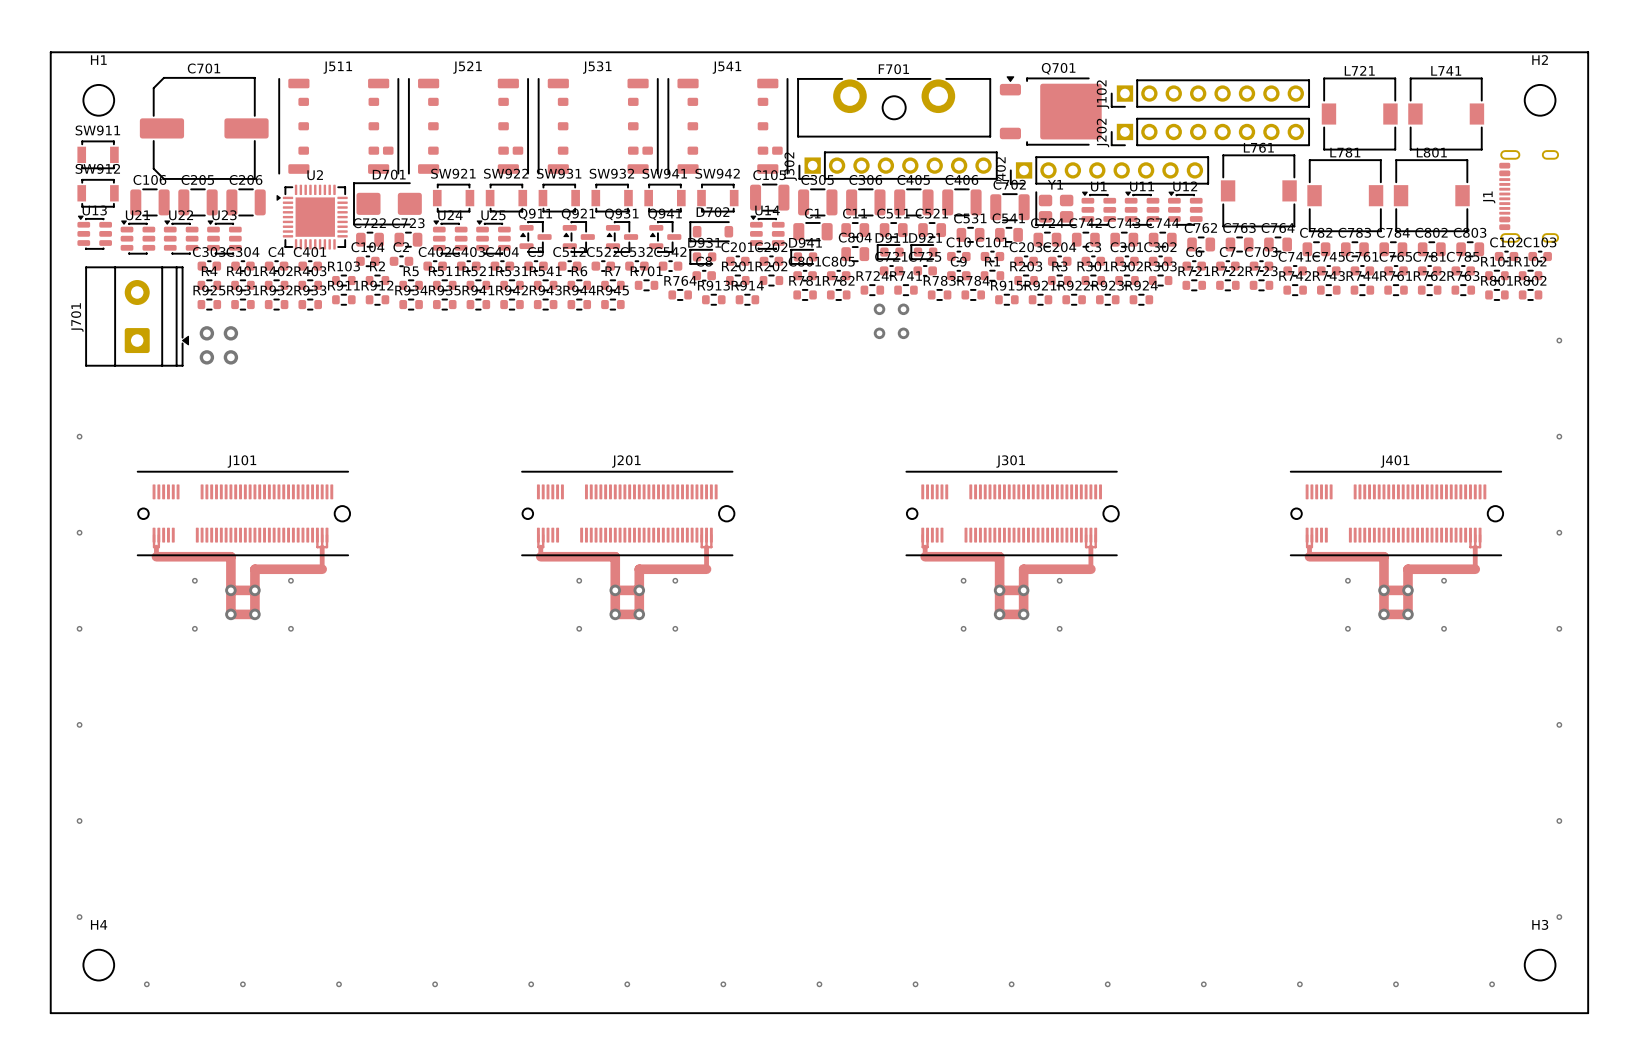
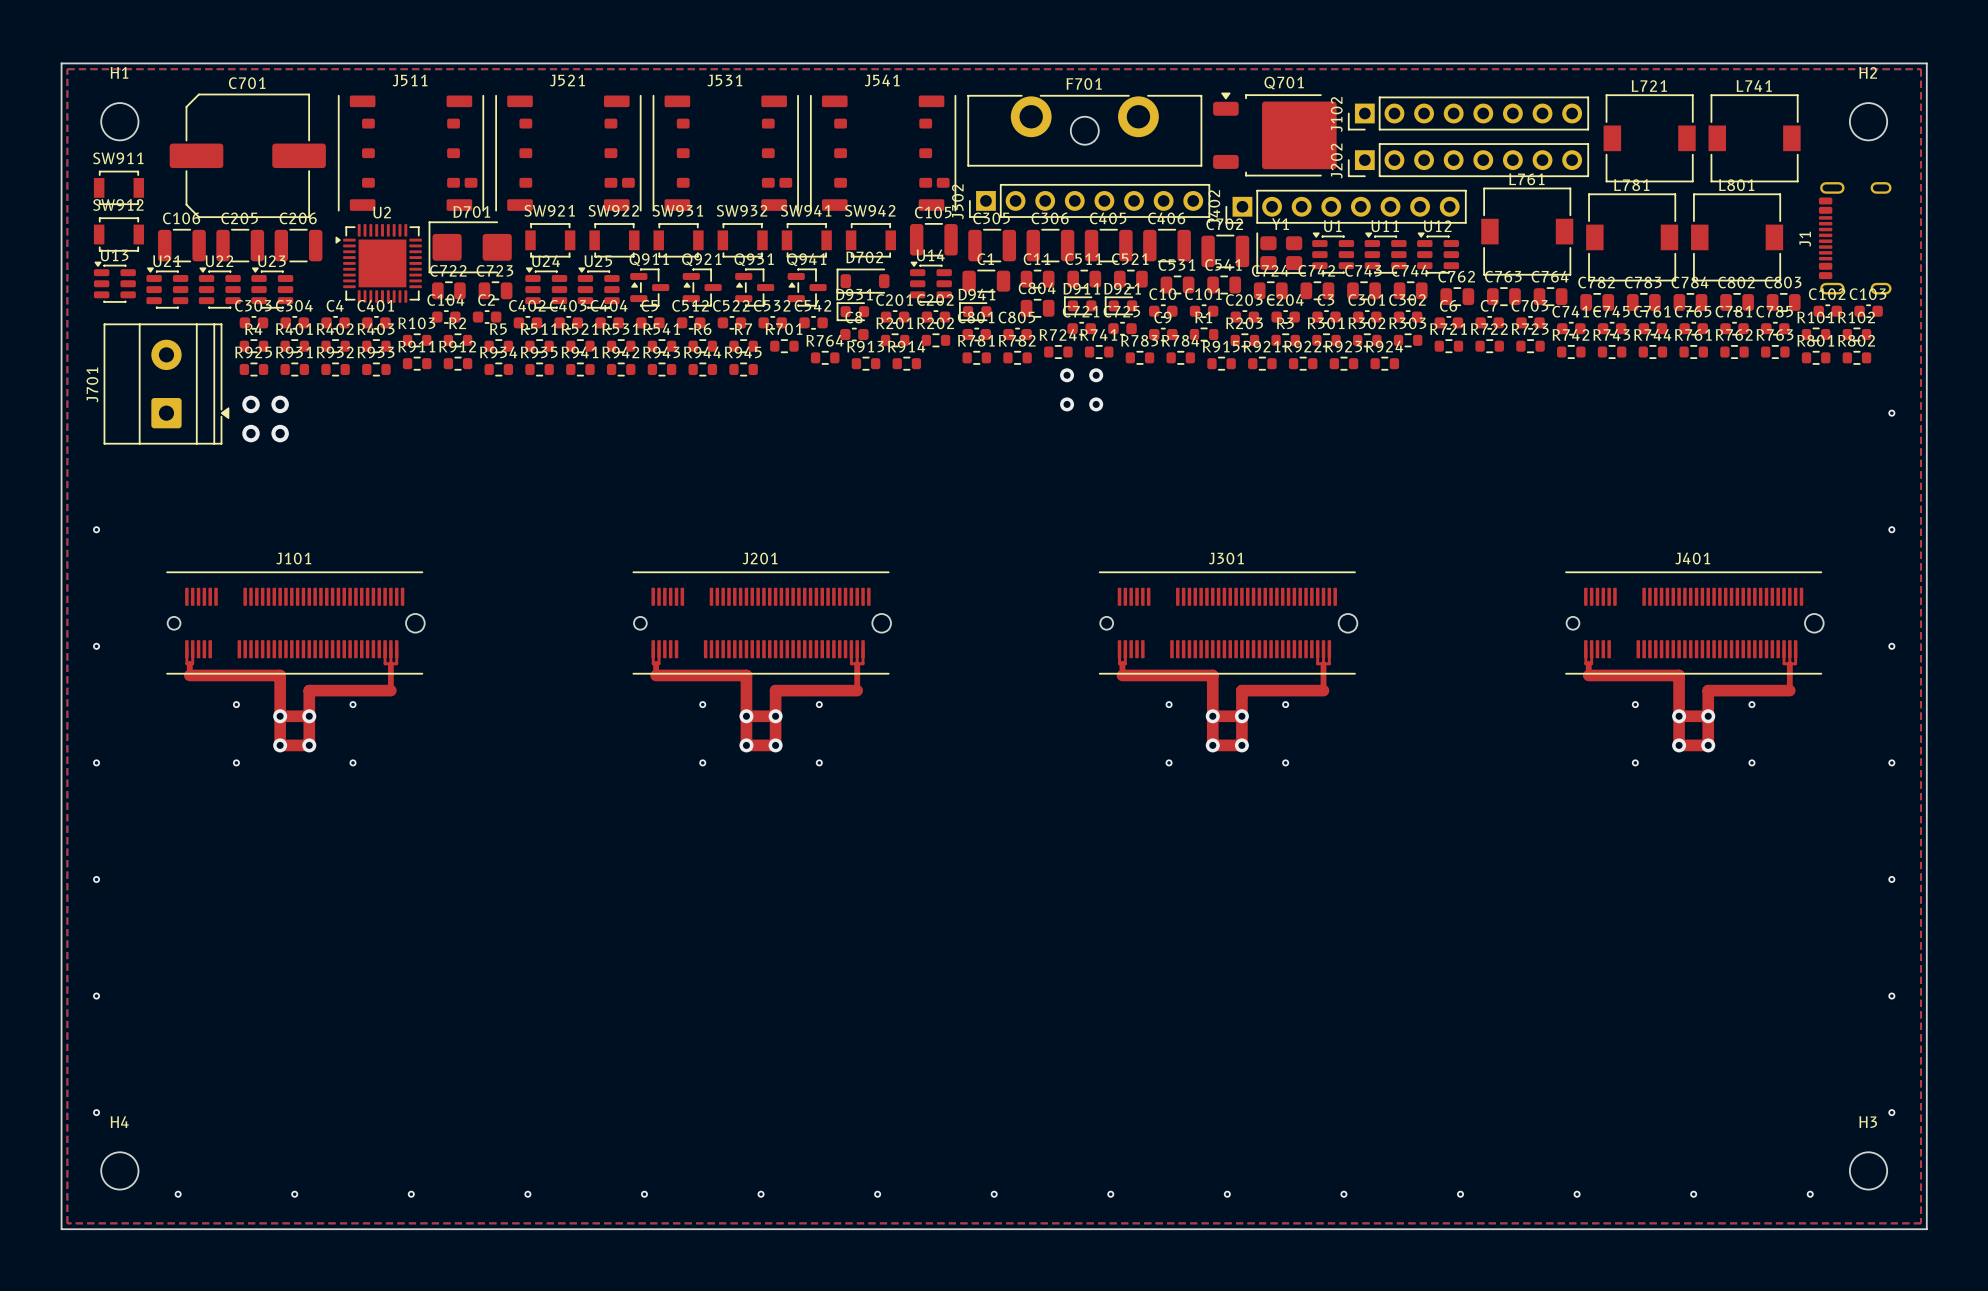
top zone outline: none -> (67, 69) (1920, 69) (1920, 1223) (67, 1223) (67, 69)

